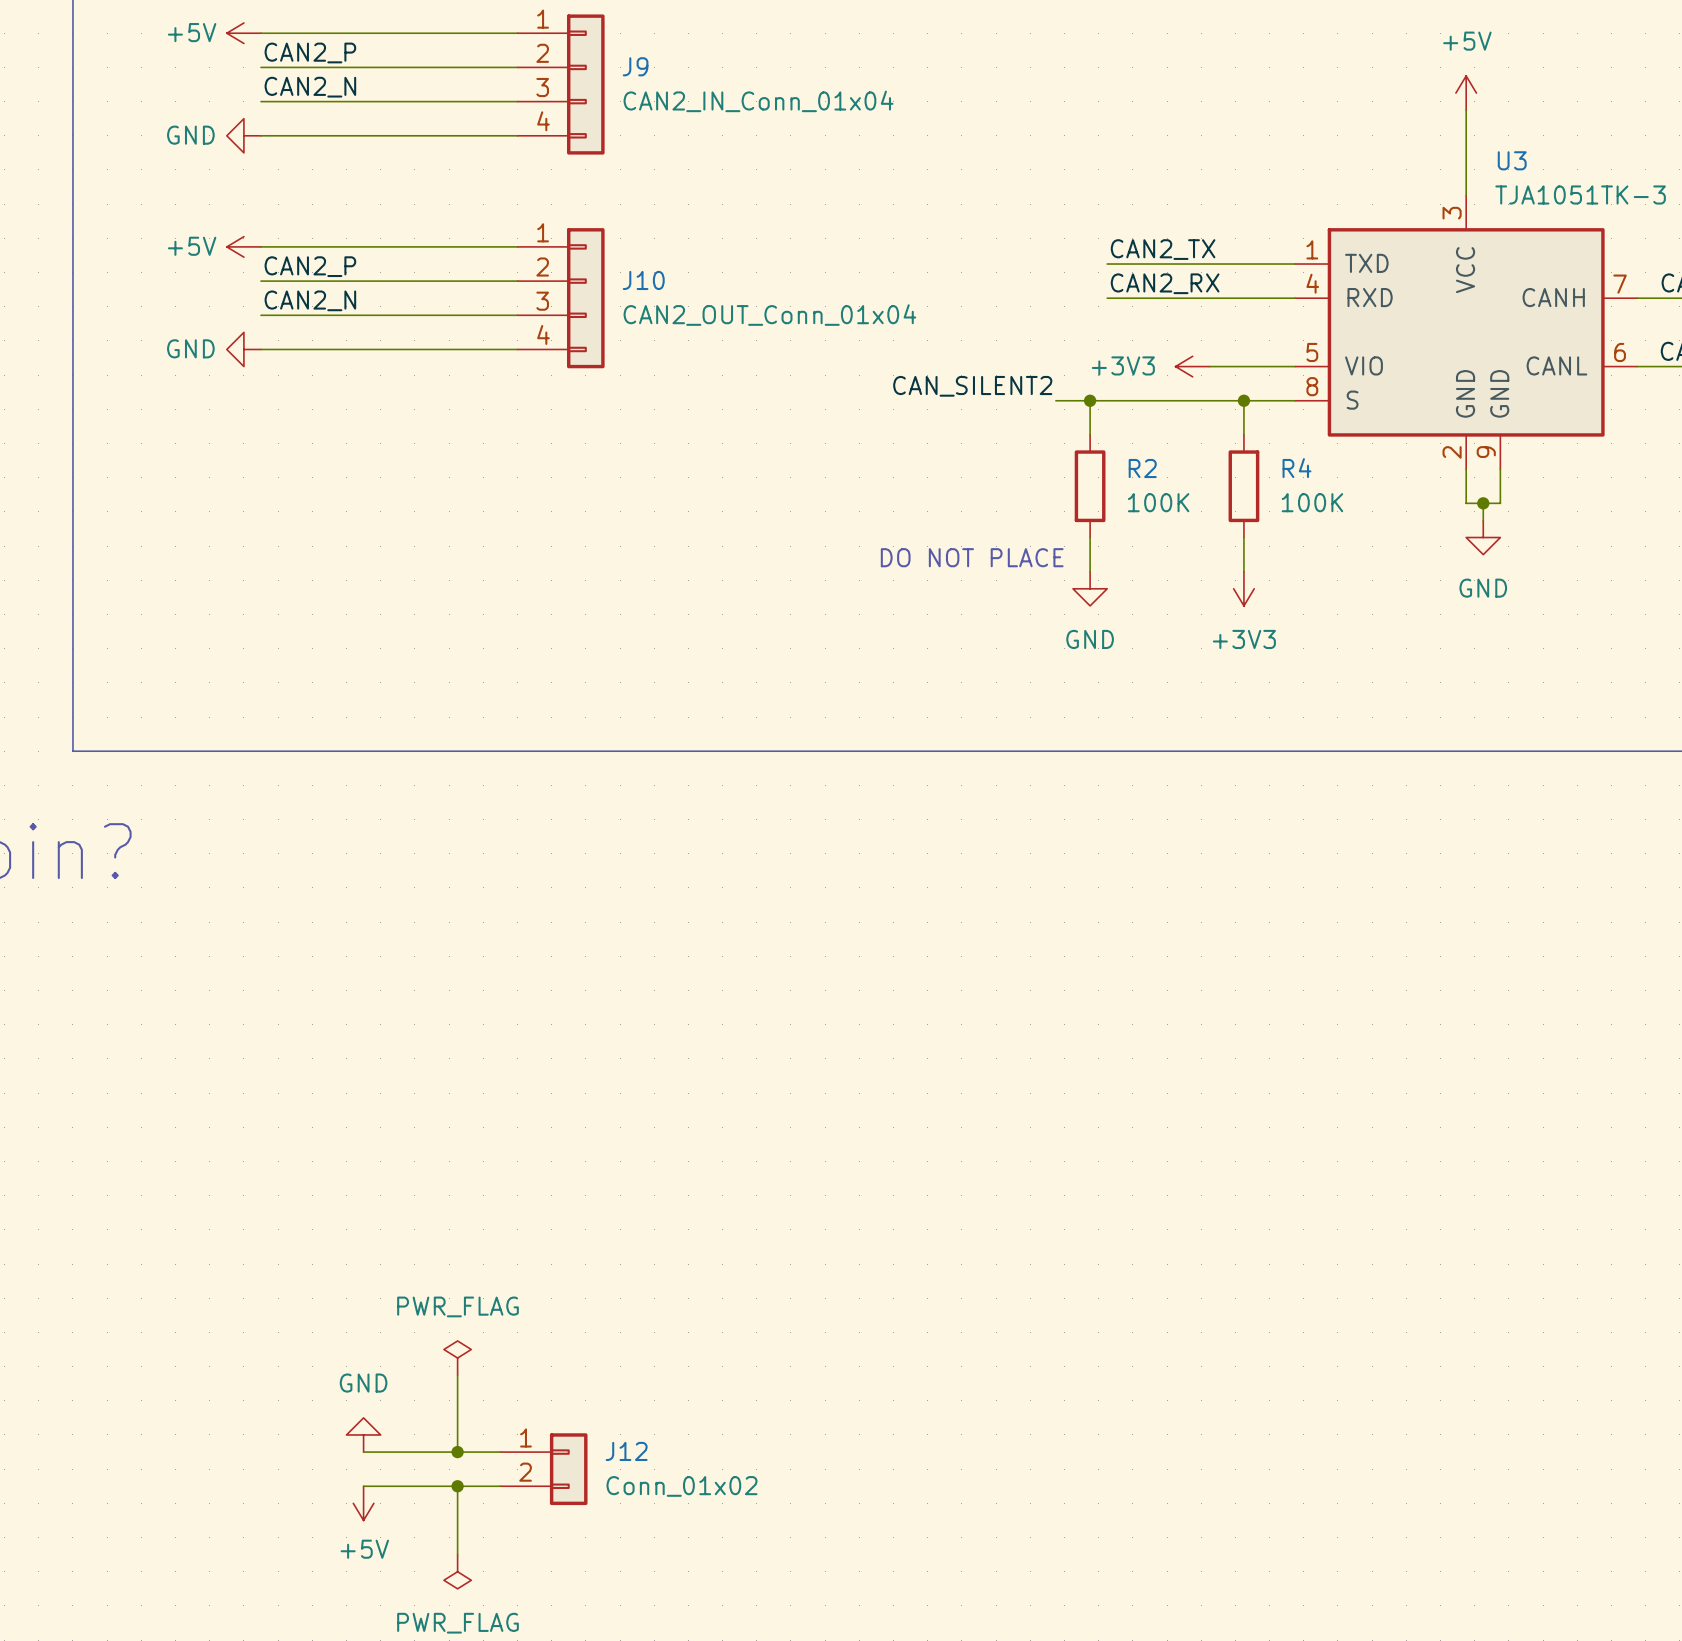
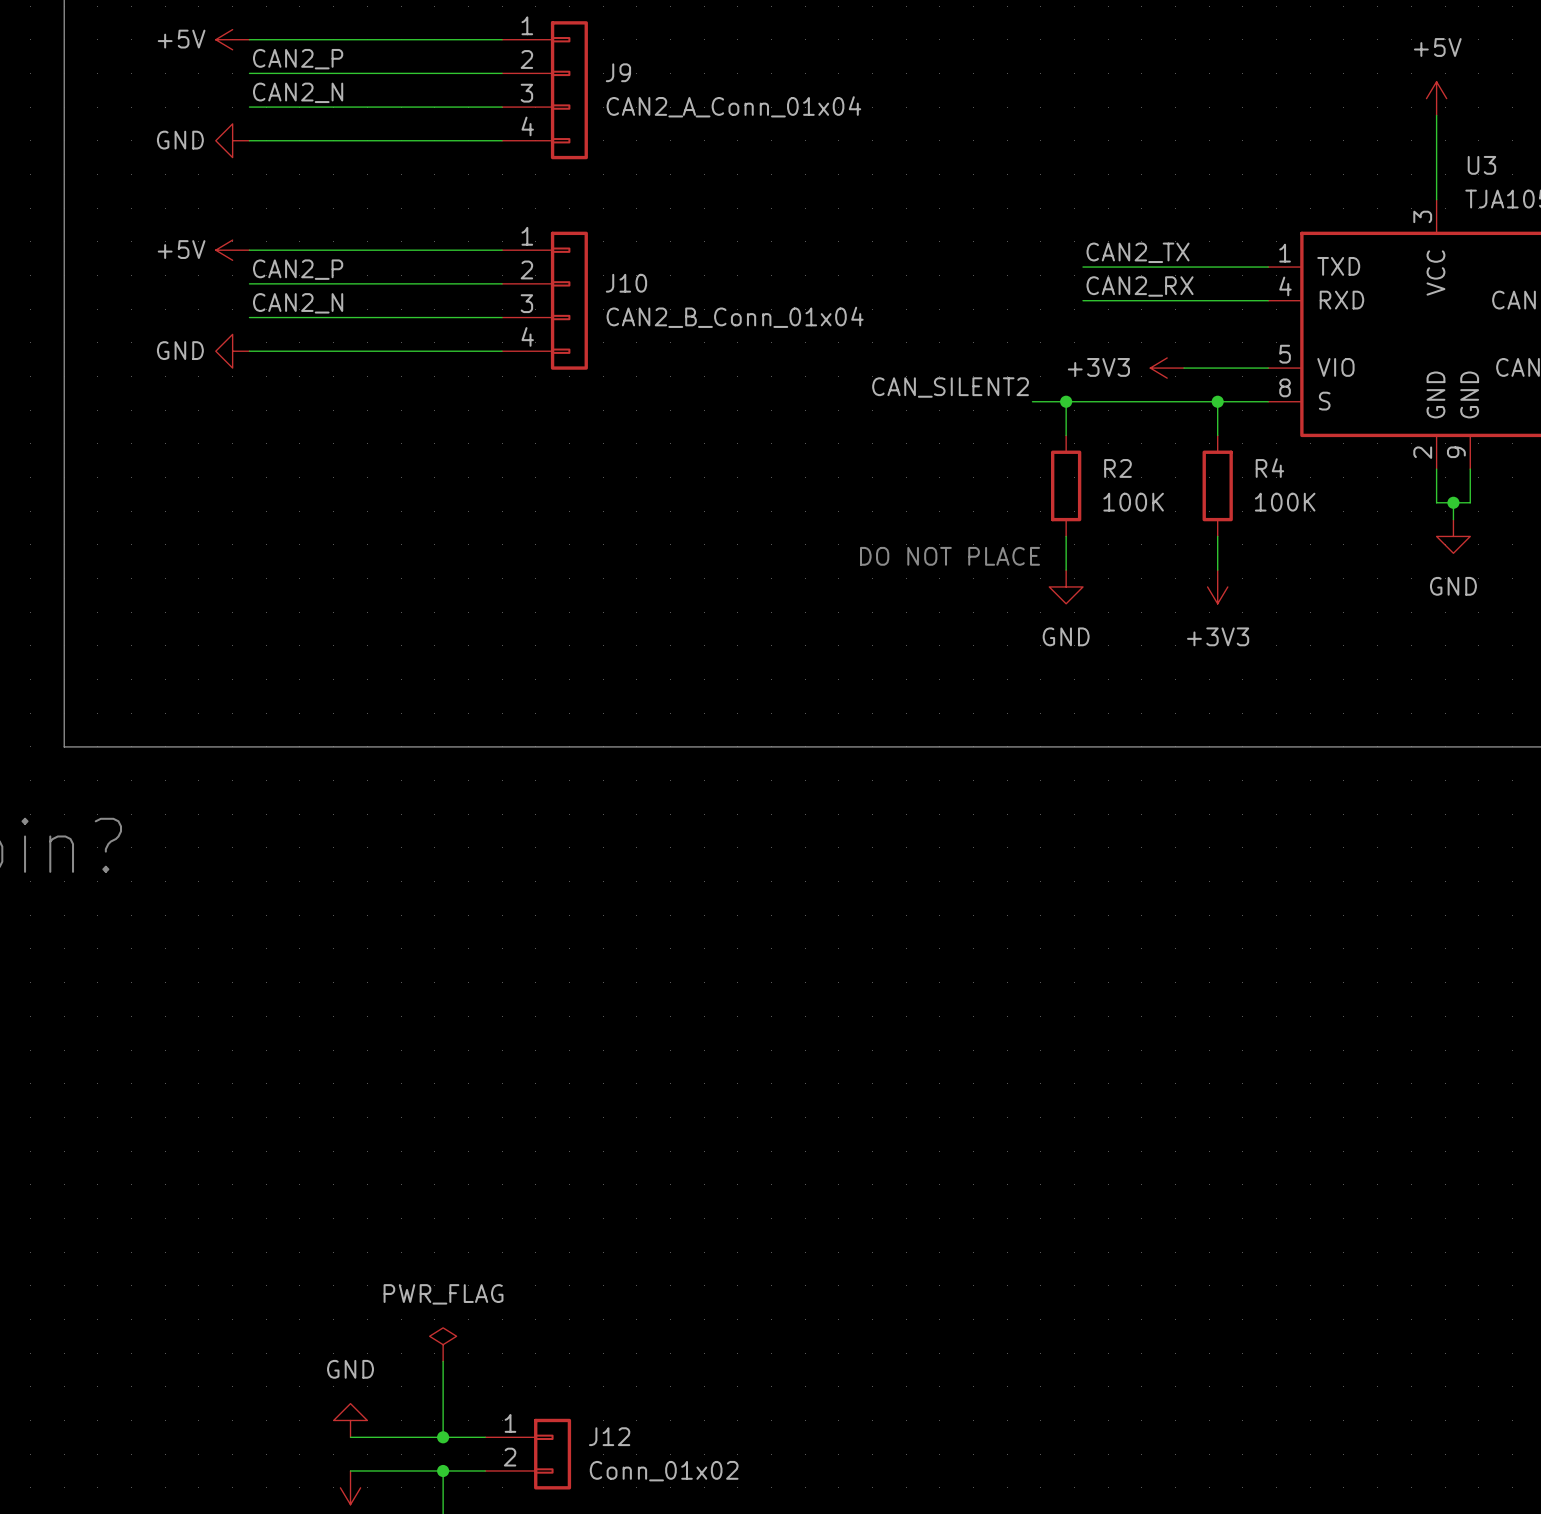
J9 value: CAN2_IN_Conn_01x04 (758, 101) -> CAN2_A_Conn_01x04 (733, 106)
J10 value: CAN2_OUT_Conn_01x04 (769, 315) -> CAN2_B_Conn_01x04 (735, 317)

